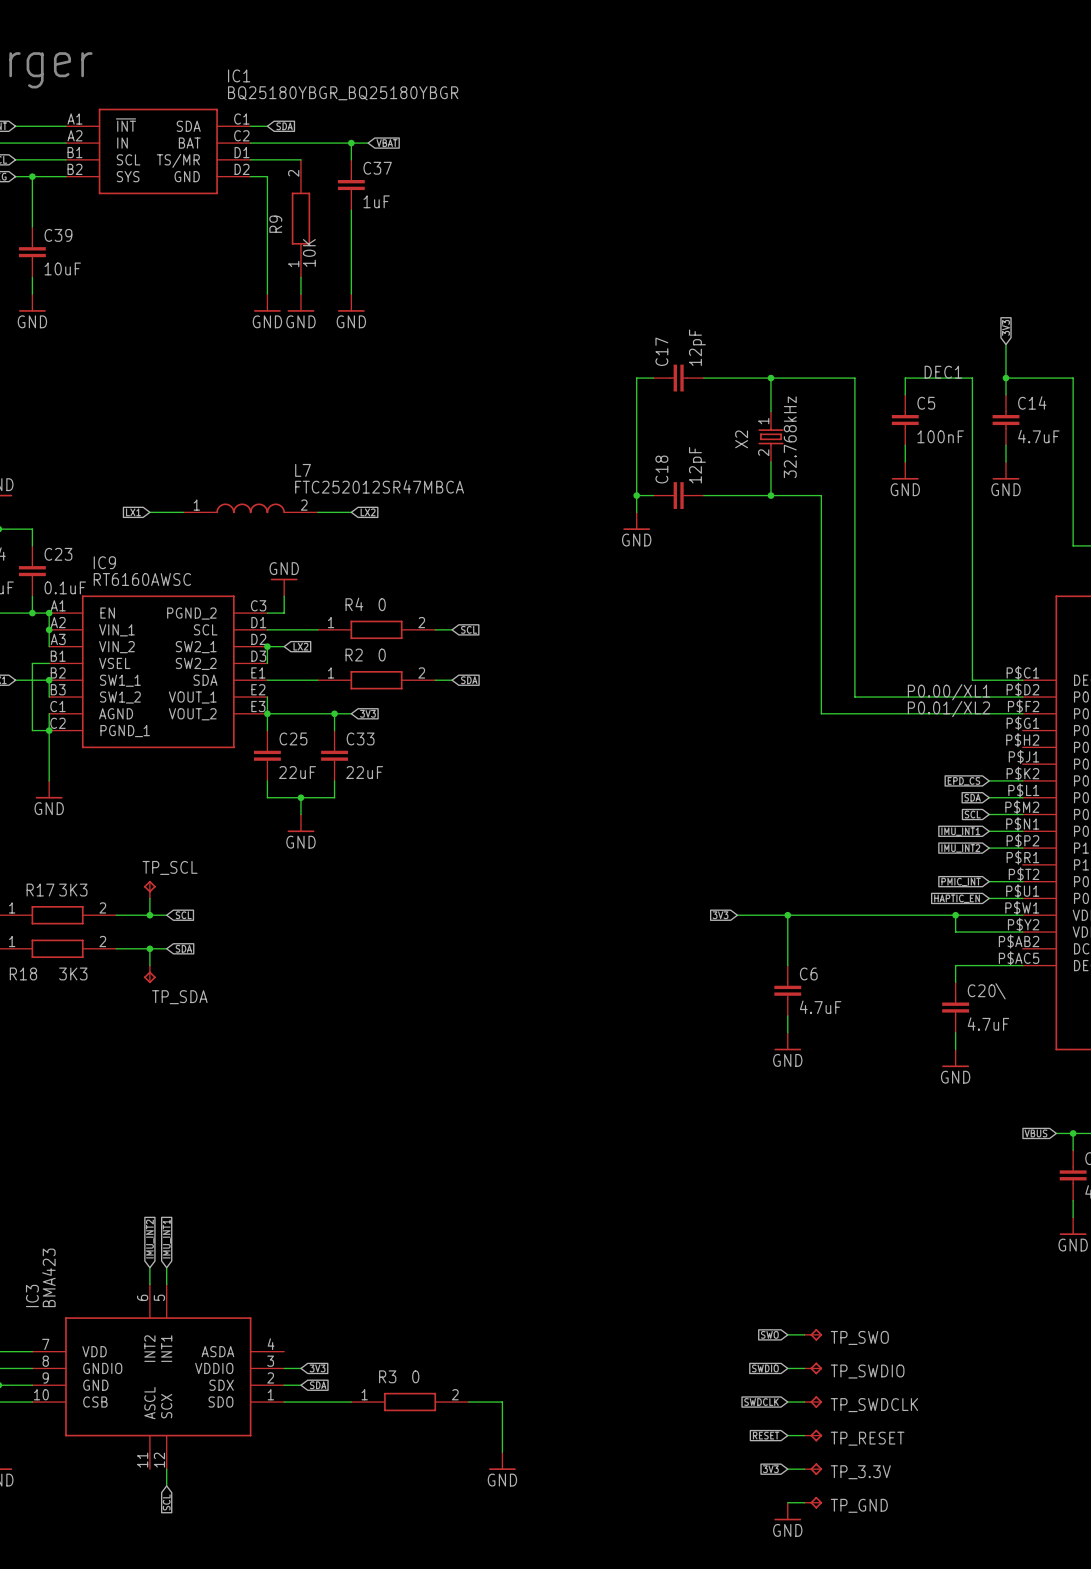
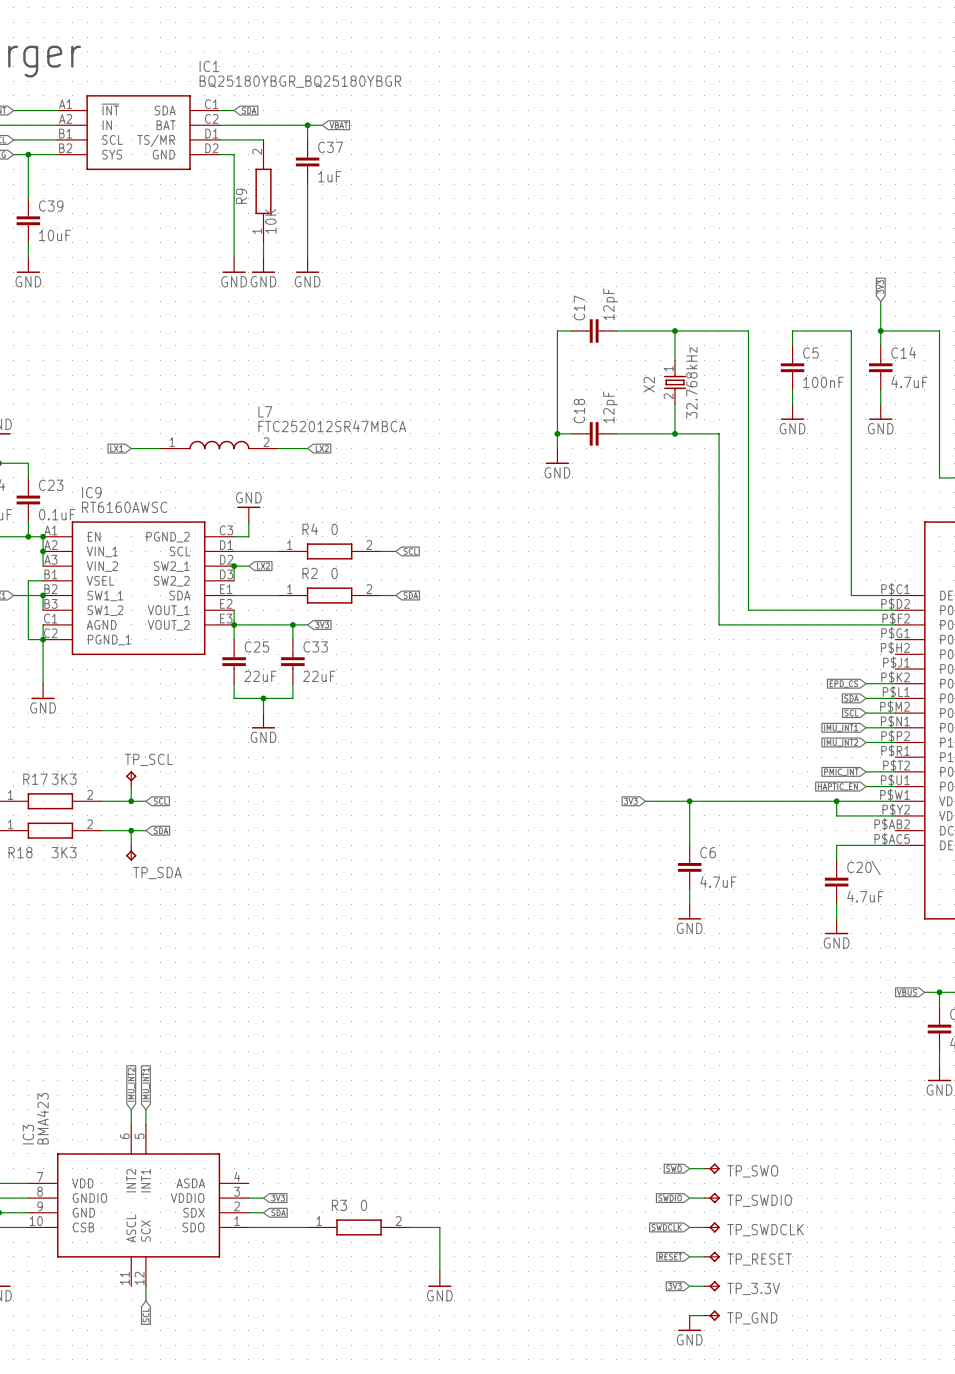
label: DEC1 (943, 372) -> none
label: P0.00/XL1 (948, 692) -> none
label: P0.01/XL2 (948, 709) -> none

